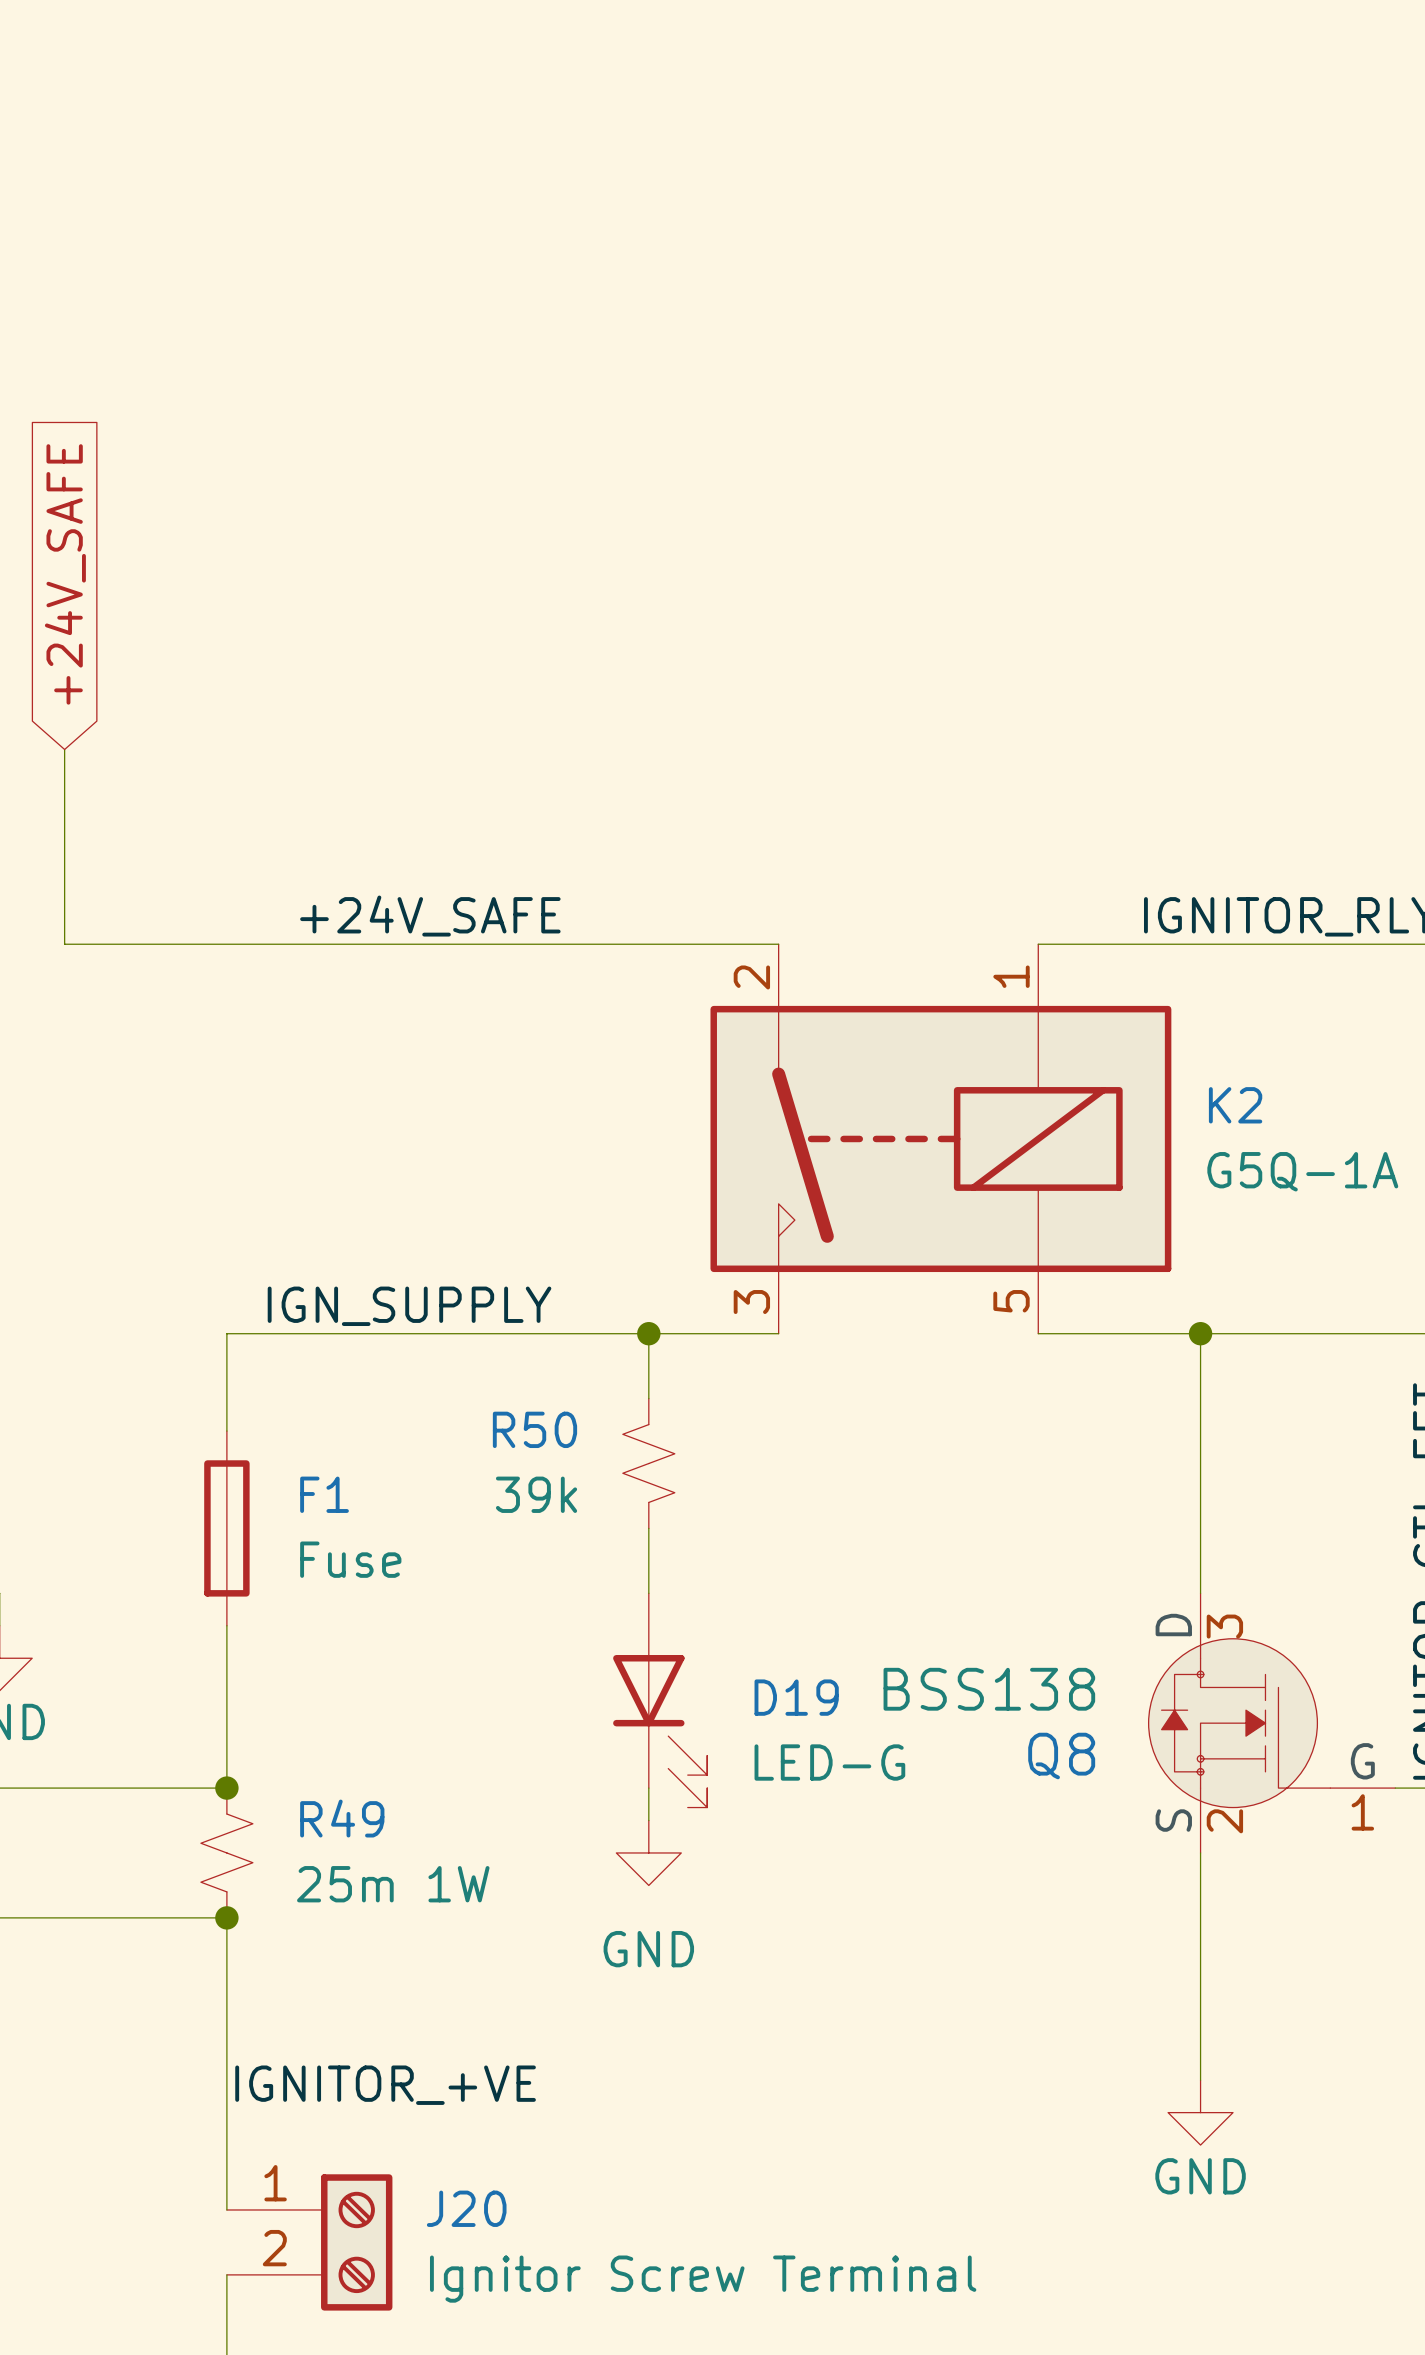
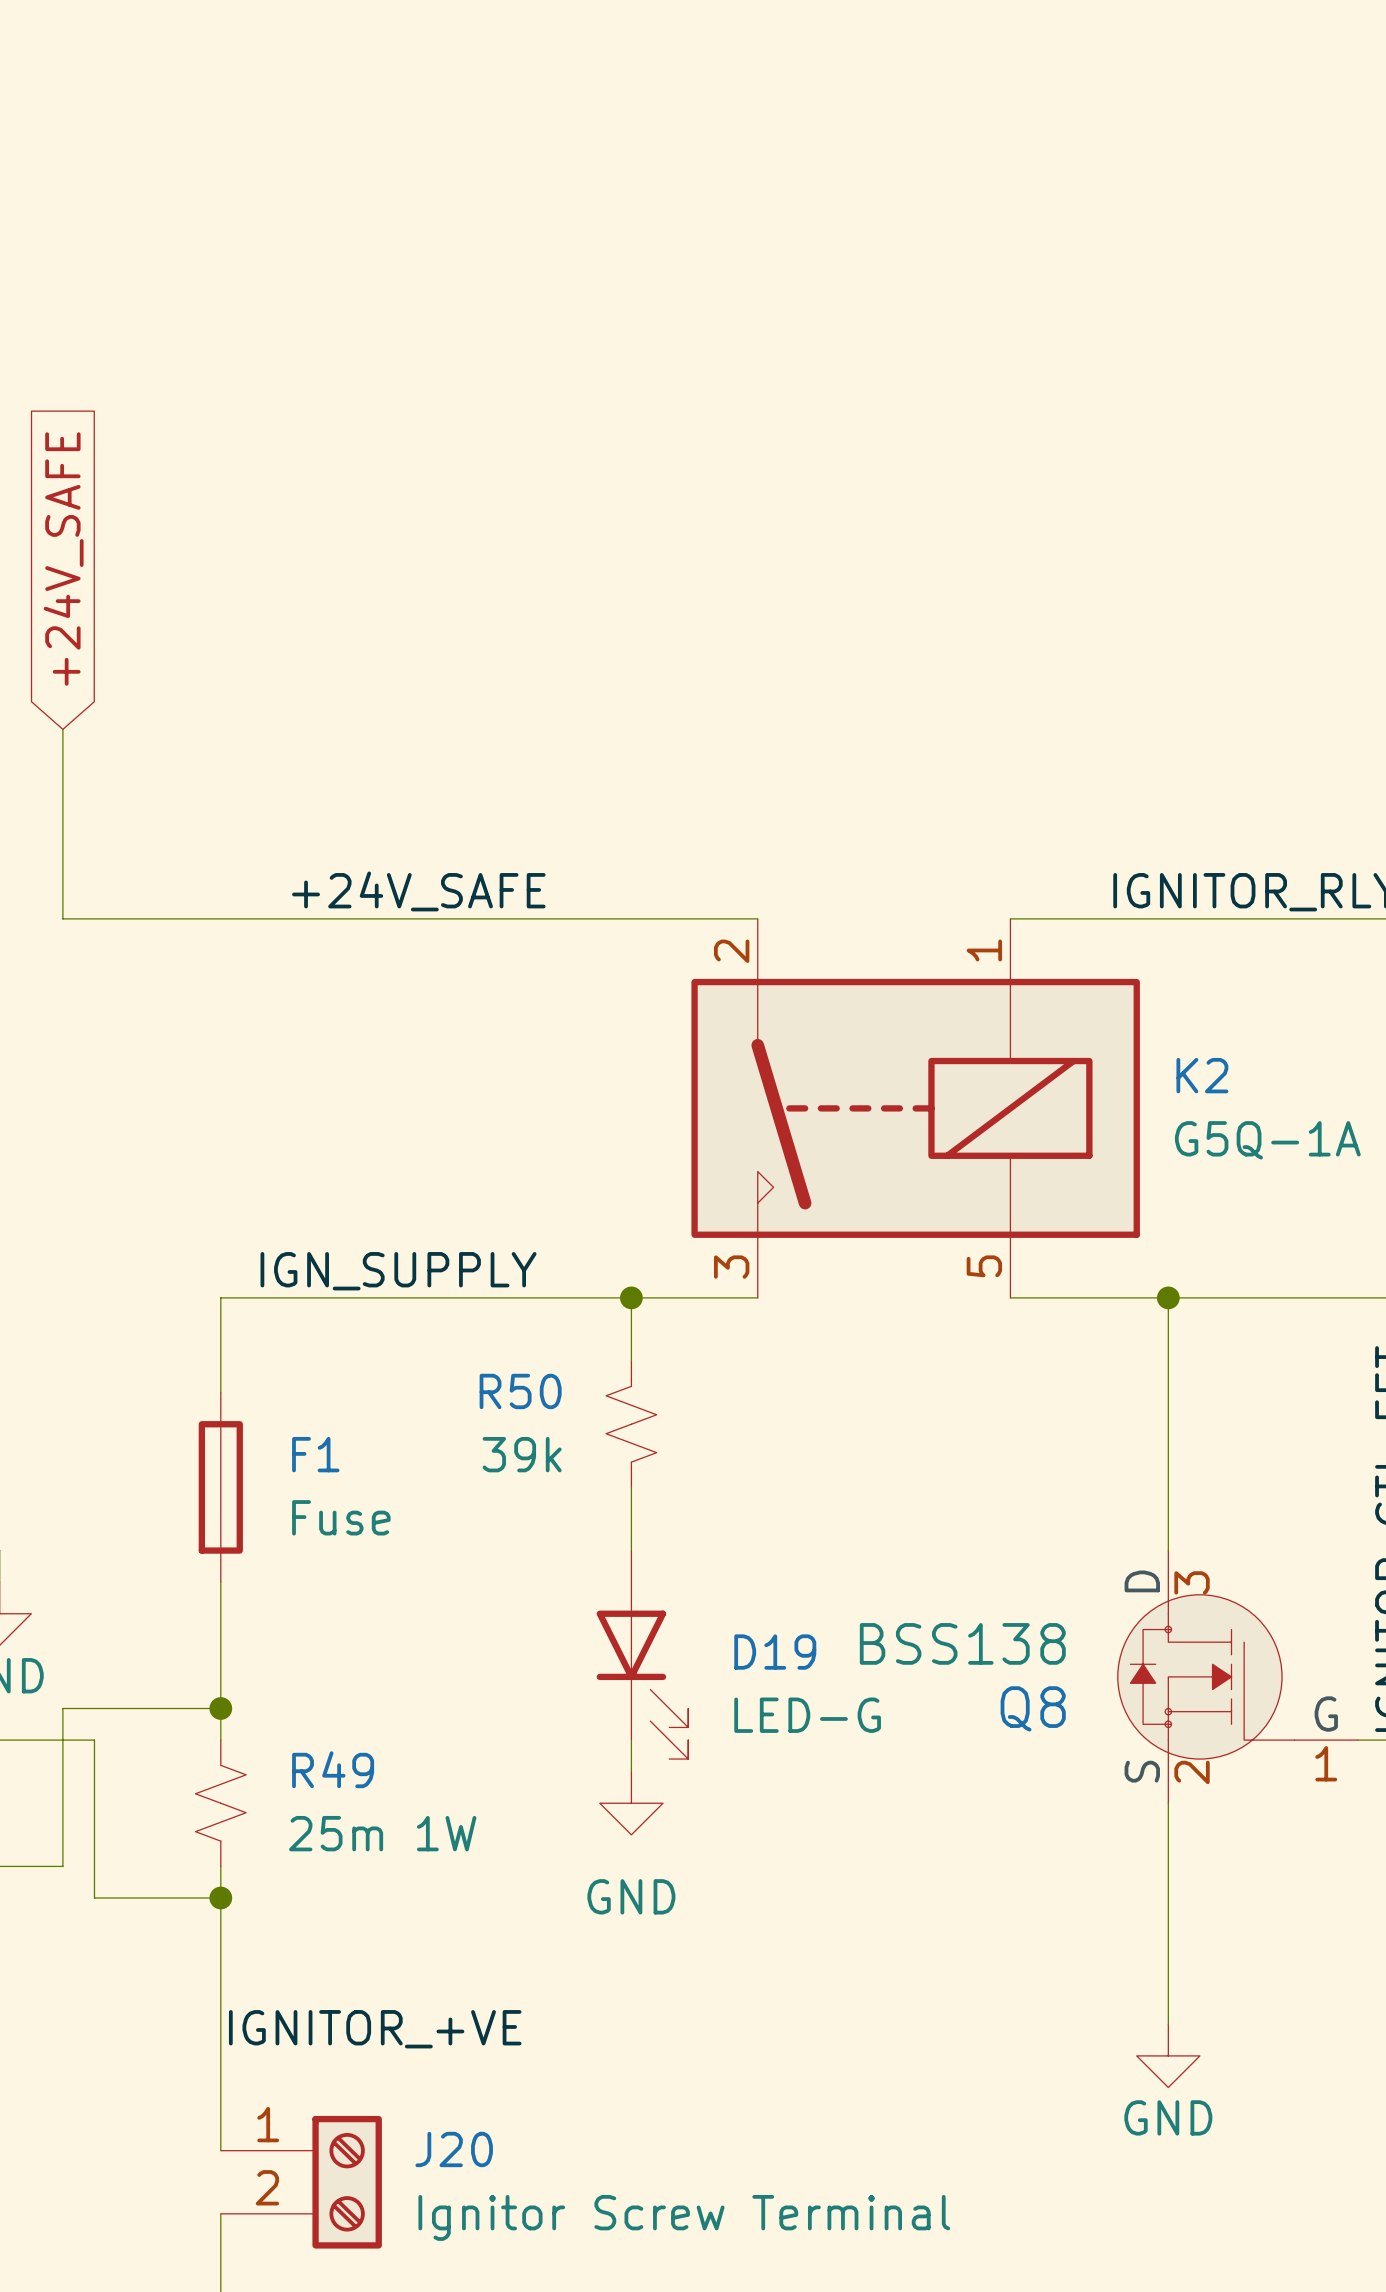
wire: (97, 1788) (226, 1788) -> (94, 1740) (94, 1898) (220, 1898)
junction position: (226, 1788) -> (220, 1708)
wire: (64, 1917) (226, 1917) -> (62, 1866) (62, 1708) (220, 1708)
junction position: (226, 1917) -> (220, 1898)

